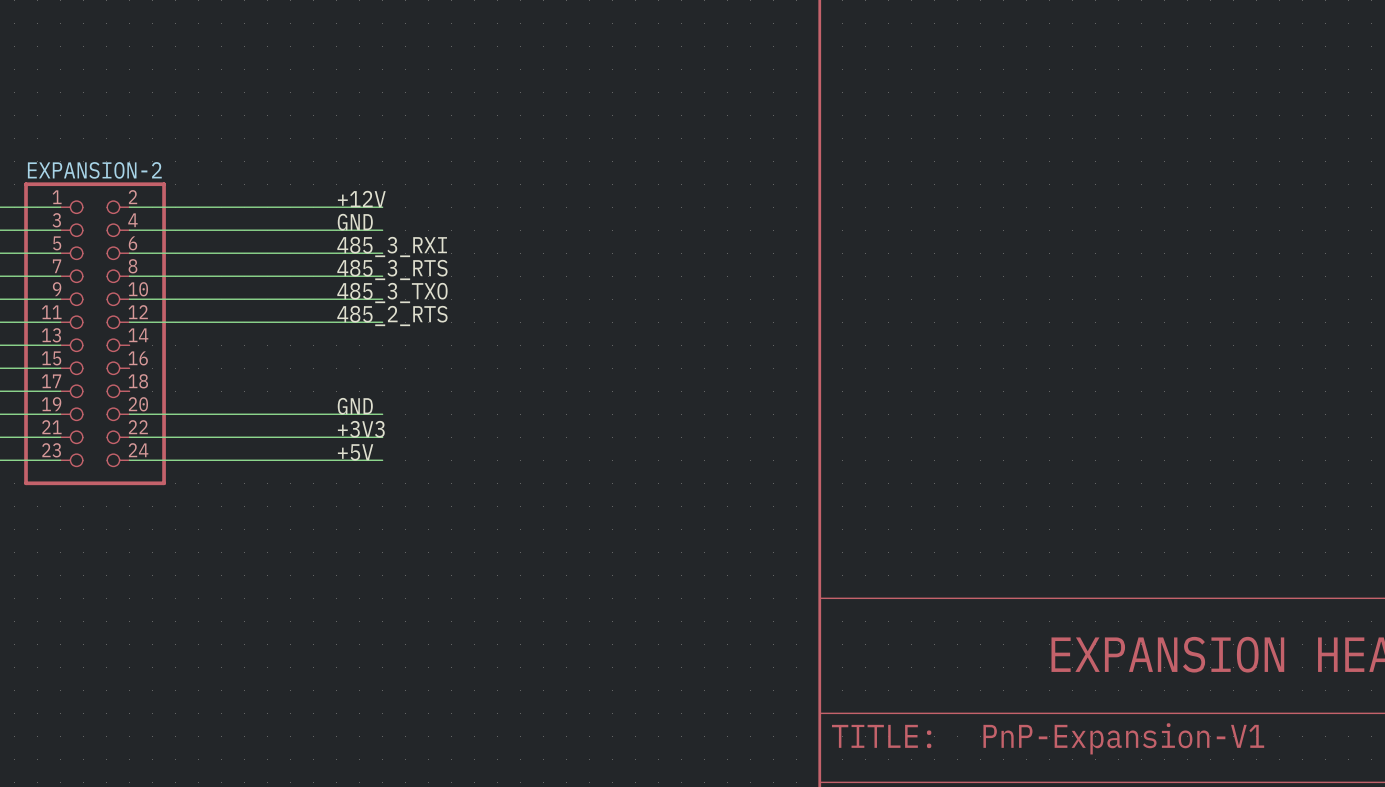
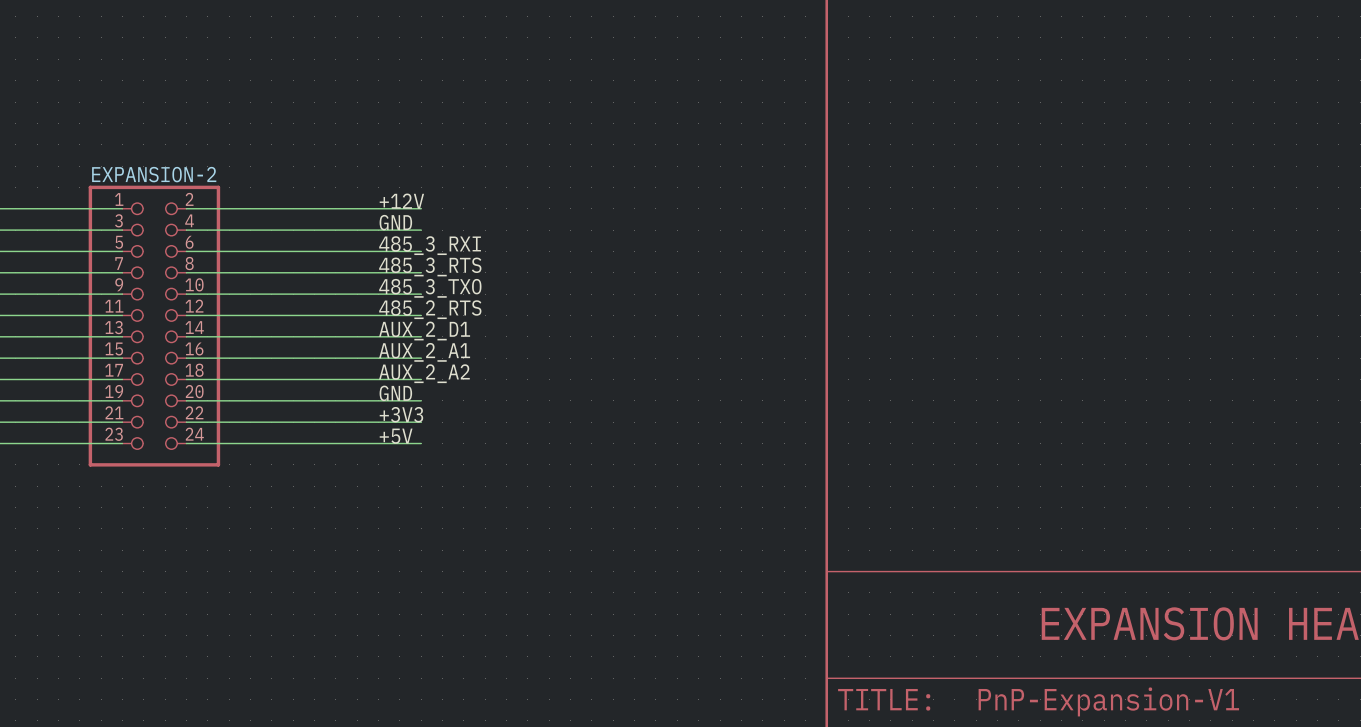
label: none -> AUX_2_D1 (424, 331)
wire: none -> (186, 336) (421, 336)
label: none -> AUX_2_A1 (424, 352)
wire: none -> (186, 358) (421, 358)
label: none -> AUX_2_A2 (424, 373)
wire: none -> (186, 379) (421, 379)

